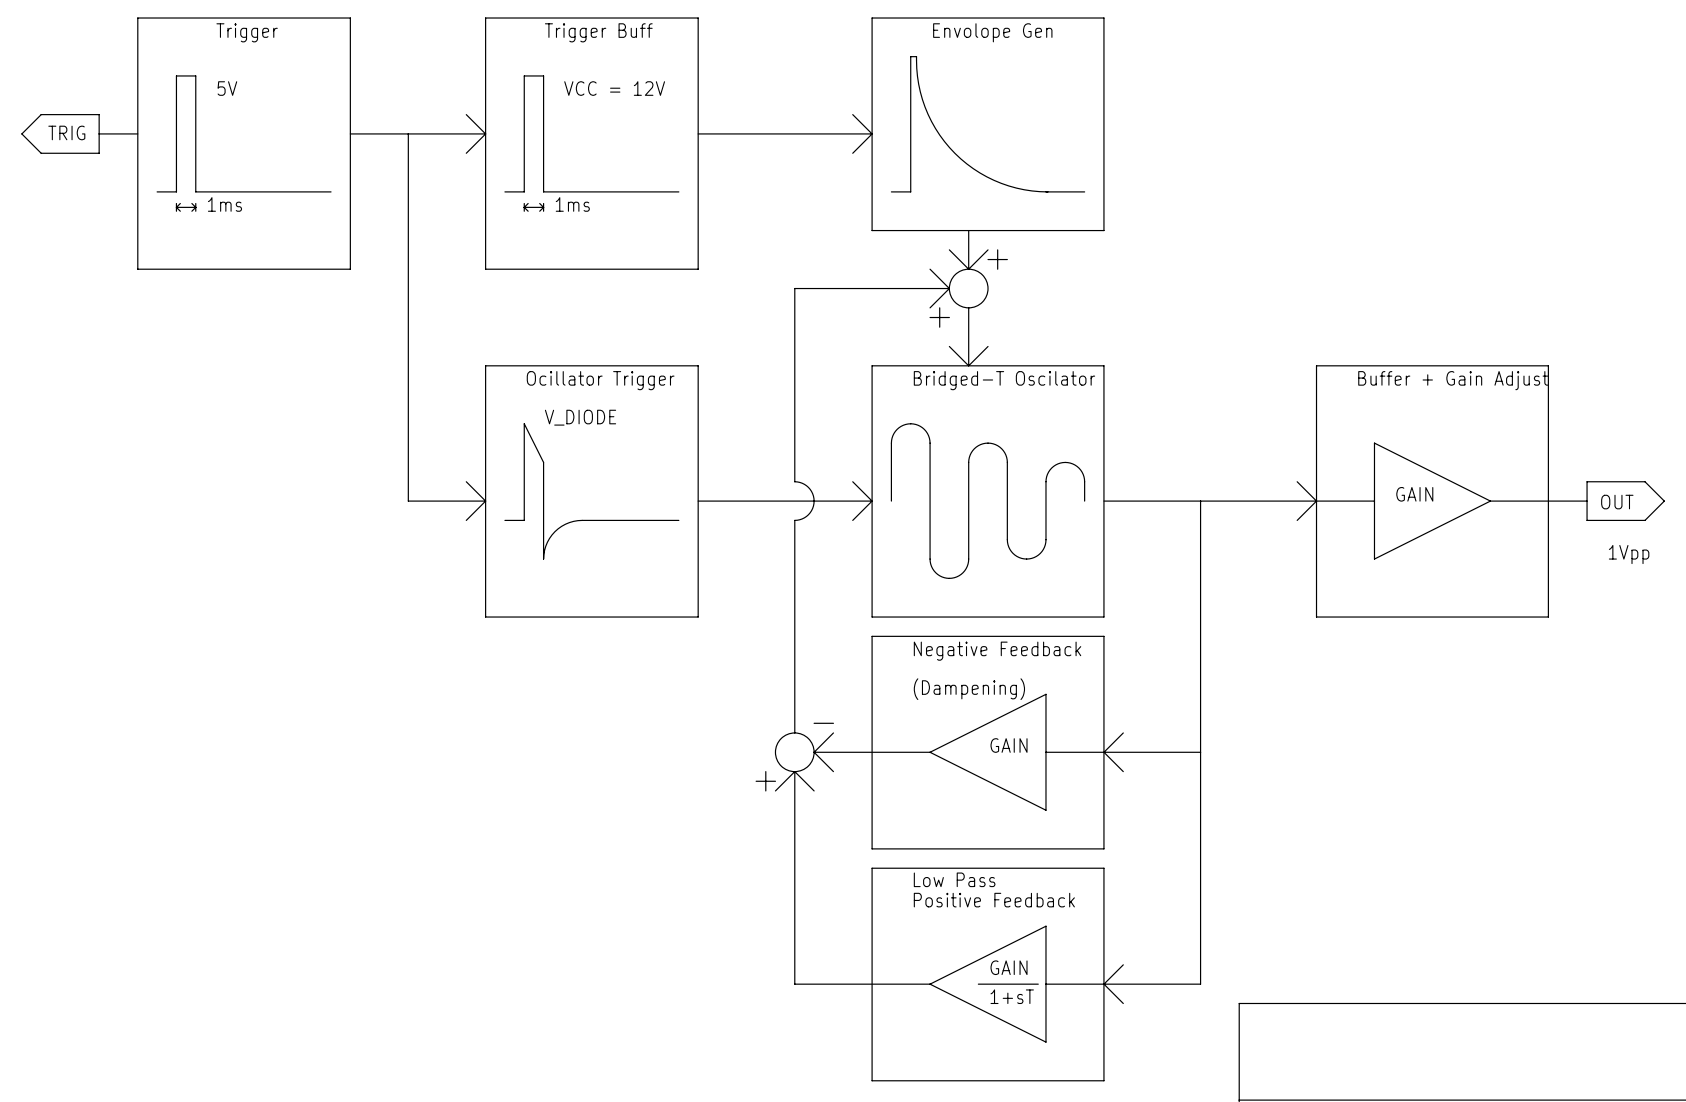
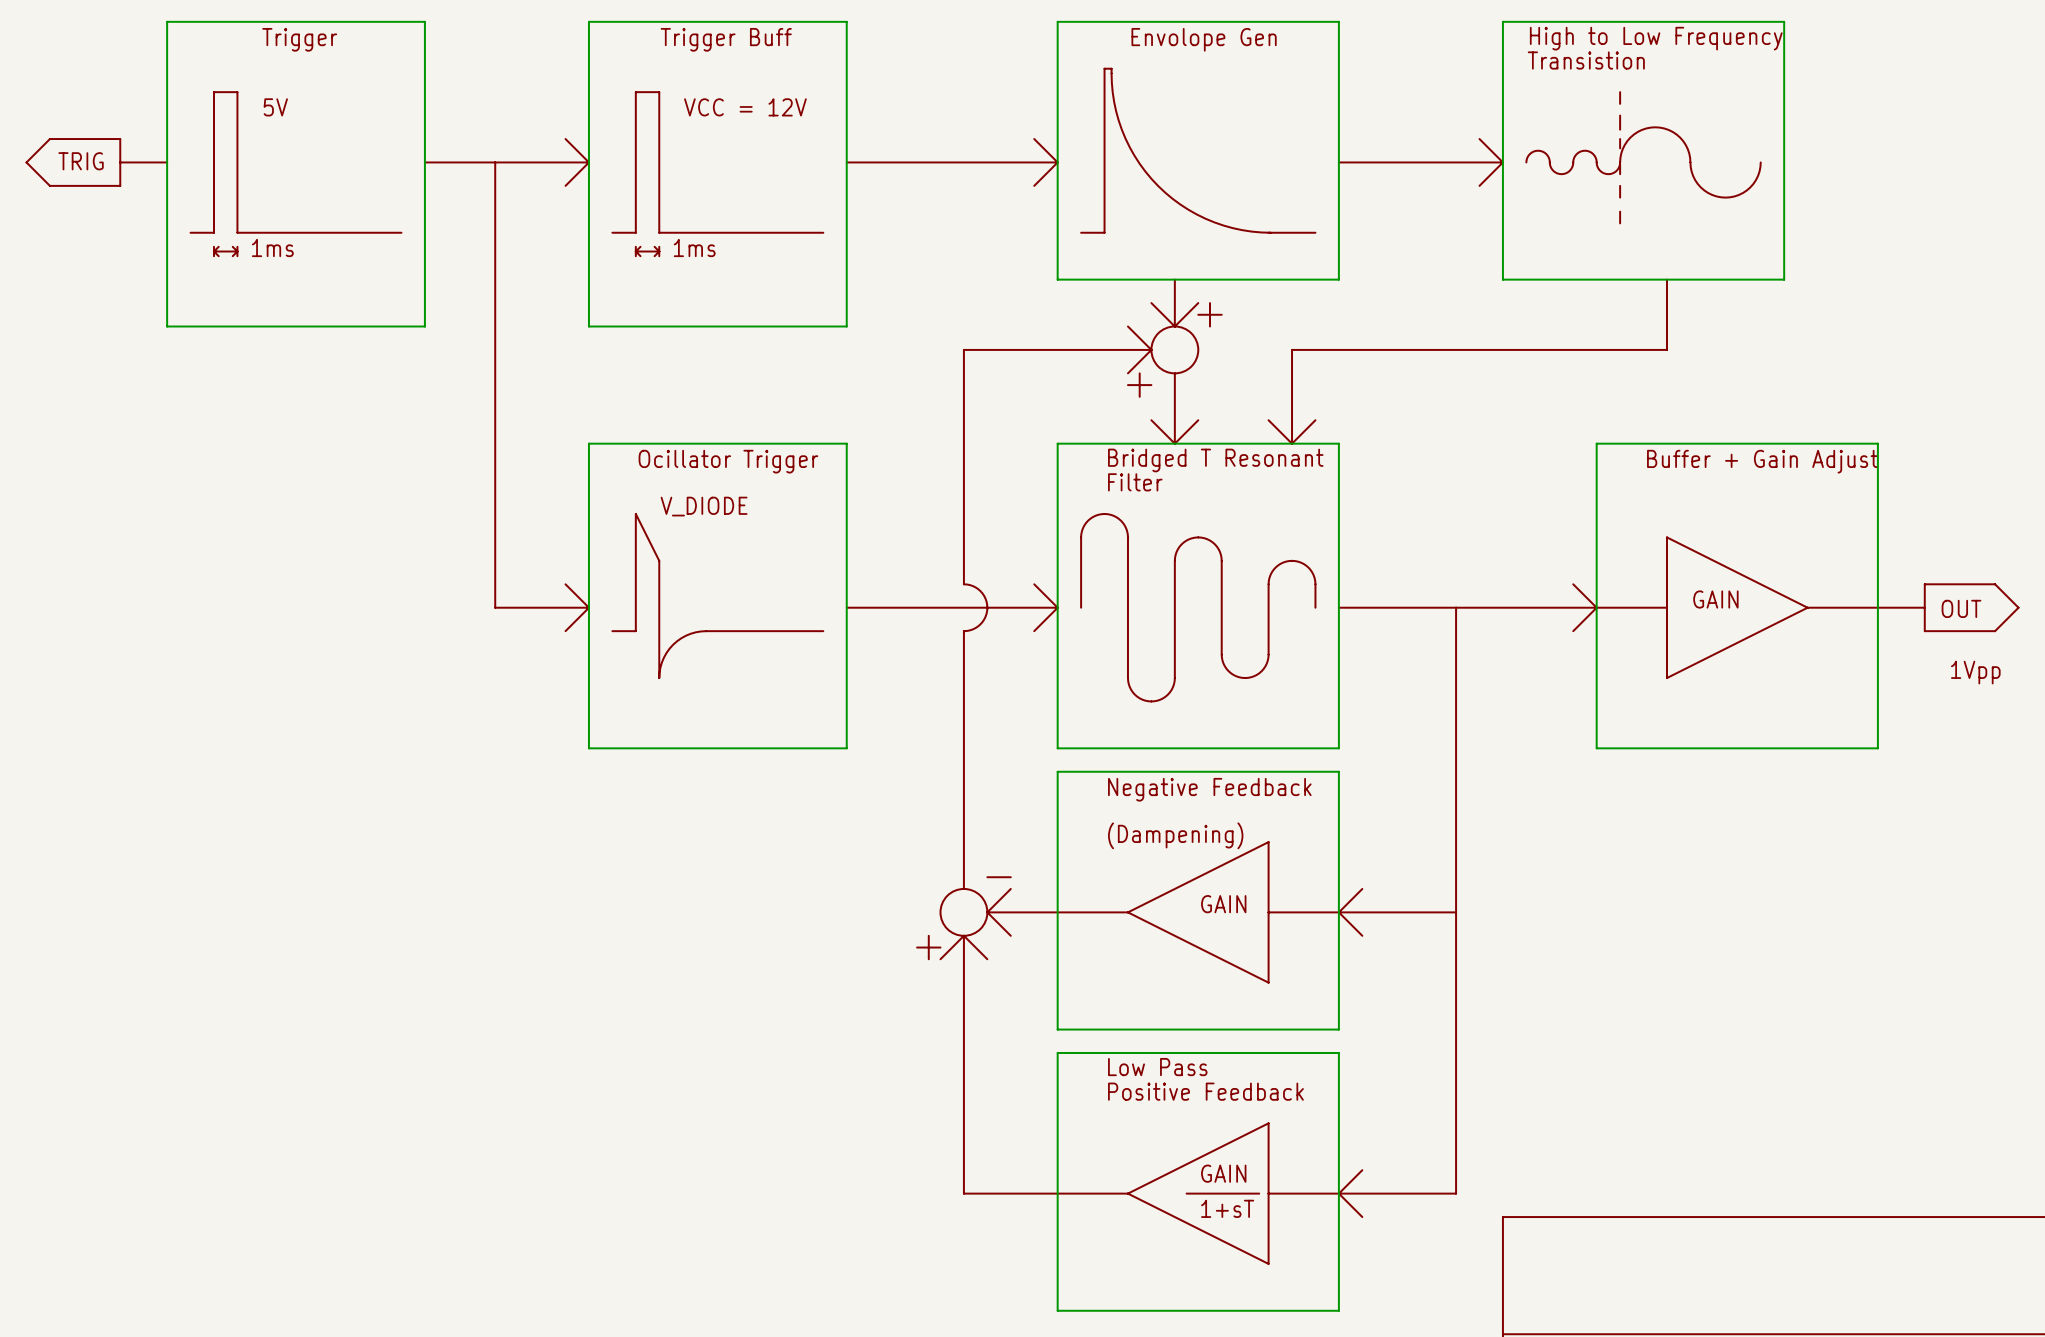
wire: none -> (1502, 21) (1784, 21) (1784, 279) (1502, 279) (1502, 21)
text: none -> High to Low Frequency (1656, 38)
text: none -> Transistion (1586, 60)
line: none -> (1620, 92) (1620, 103)
line: none -> (1620, 115) (1620, 129)
line: none -> (1479, 139) (1502, 162)
line: none -> (1620, 139) (1620, 148)
line: none -> (1338, 162) (1502, 162)
line: none -> (1502, 162) (1479, 185)
line: none -> (1526, 162) (1530, 153) (1541, 151) (1548, 156) (1553, 170) (1563, 174) (1570, 169) (1576, 154) (1586, 150) (1594, 155) (1600, 170) (1605, 173) (1611, 173) (1618, 168) (1622, 149) (1630, 137) (1646, 128) (1659, 127) (1672, 132) (1683, 141) (1689, 153) (1693, 175) (1700, 187) (1712, 194) (1725, 197) (1739, 194) (1750, 187) (1758, 175) (1760, 162)
line: none -> (1620, 164) (1620, 174)
line: none -> (1620, 185) (1620, 197)
line: none -> (1620, 211) (1620, 223)
line: none -> (1666, 279) (1666, 349) (1292, 349) (1292, 443)
line: none -> (1268, 420) (1292, 443)
line: none -> (1315, 420) (1292, 443)
text: Bridged-T Oscilator (1004, 380) -> Bridged T Resonant (1215, 460)
text: none -> Filter (1135, 482)

